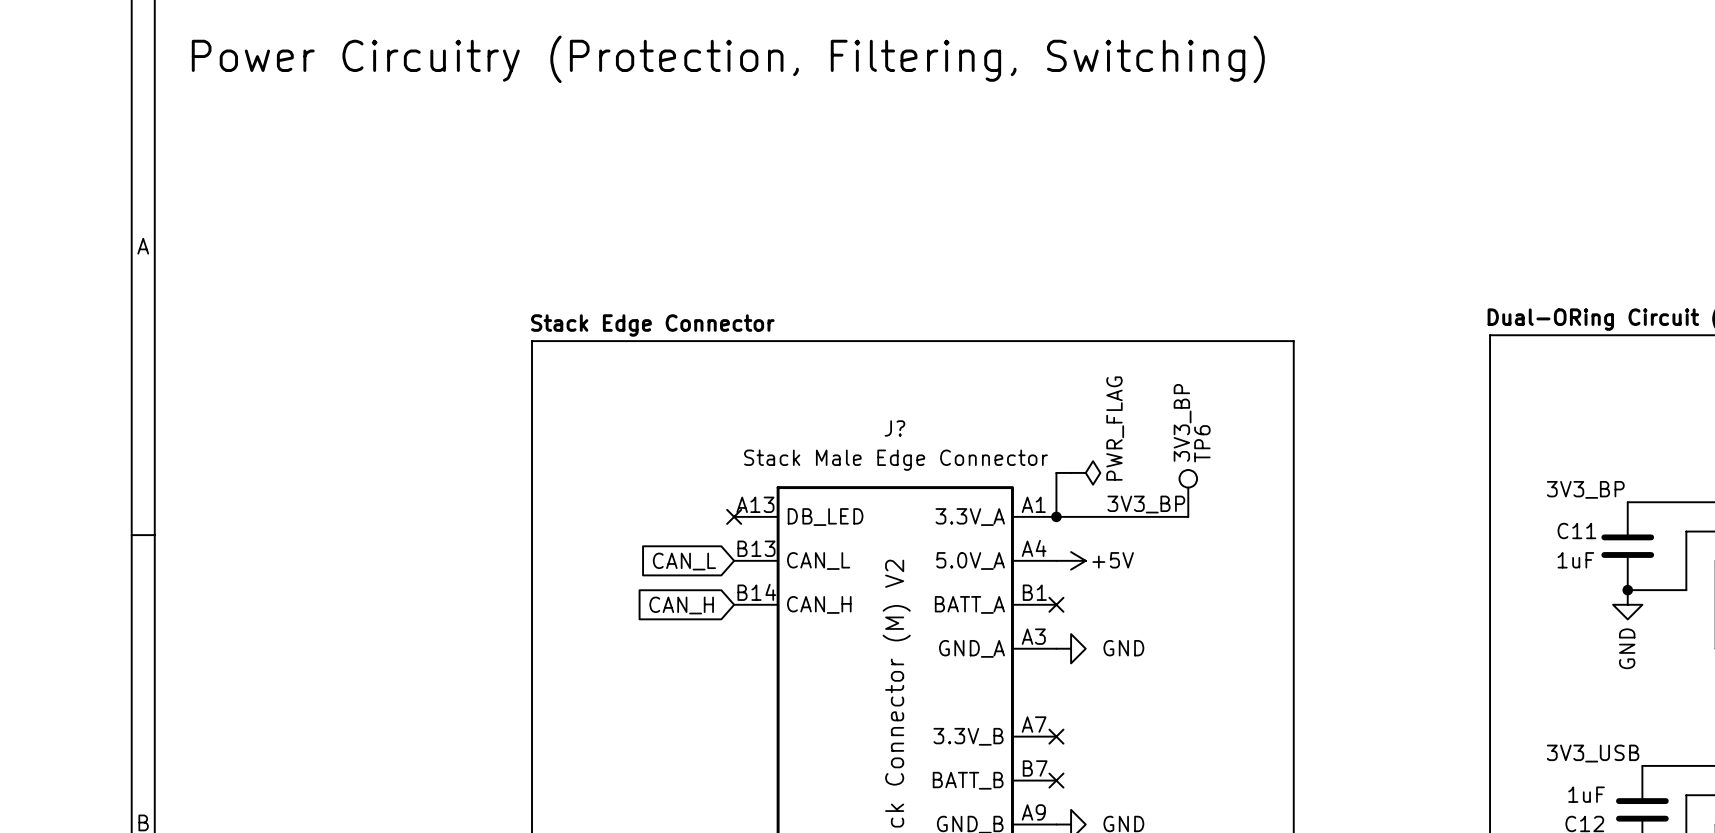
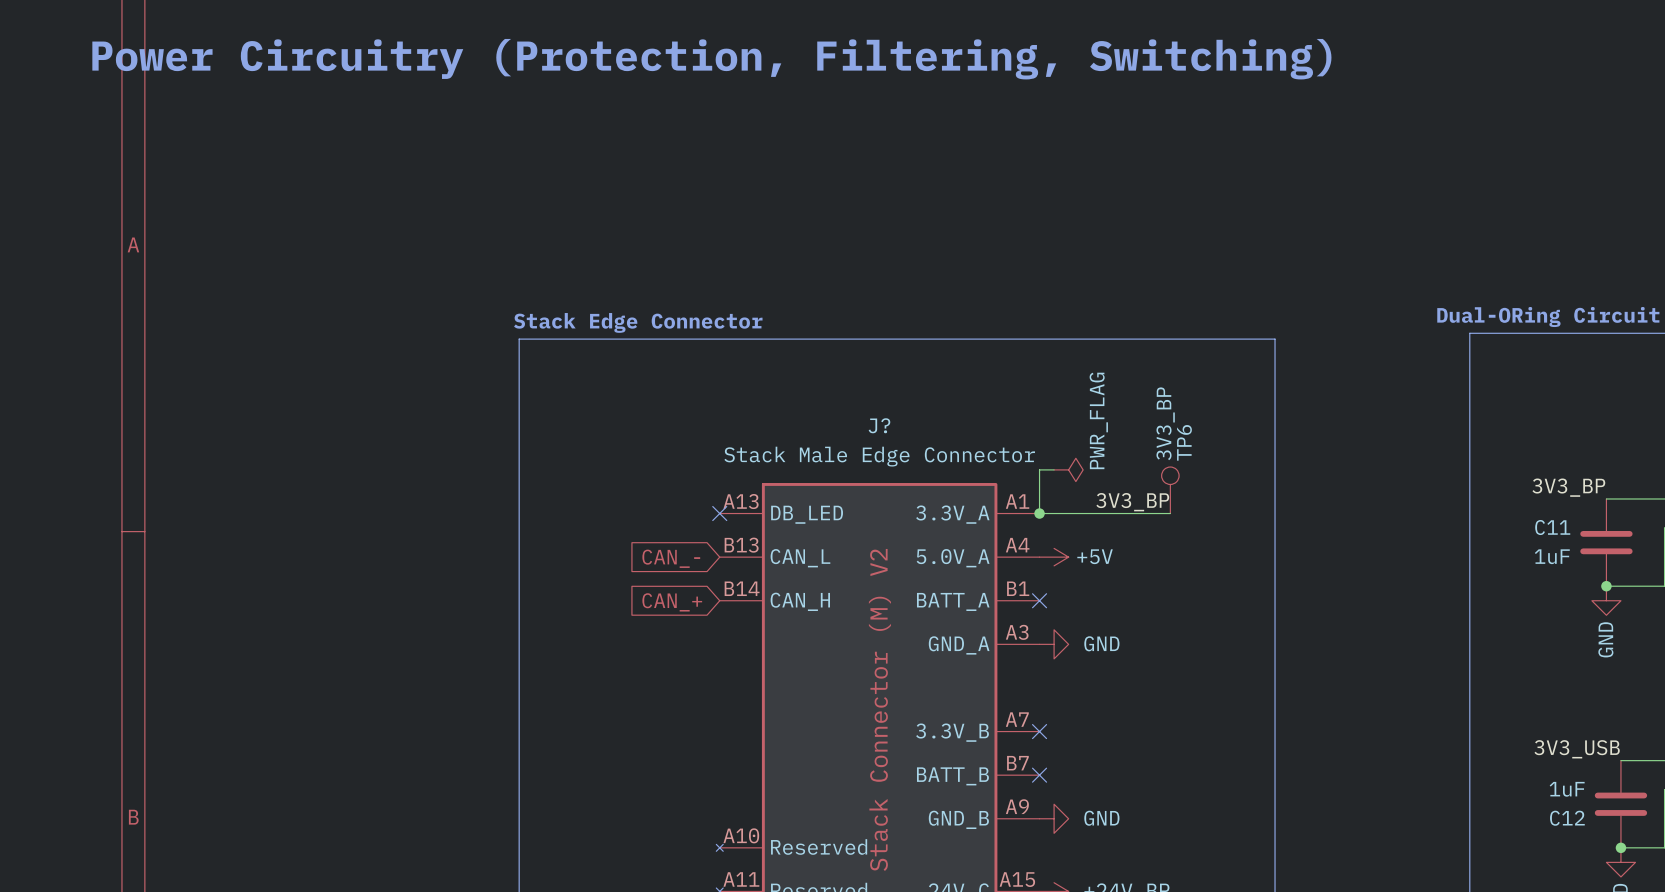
global label: CAN_L (684, 561) -> CAN_- (671, 558)
global label: CAN_H (681, 605) -> CAN_+ (672, 602)

